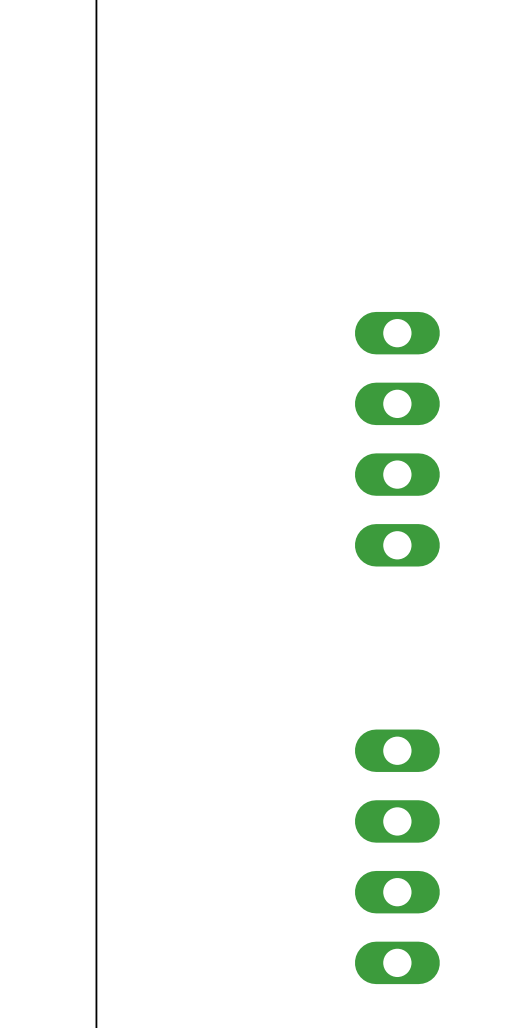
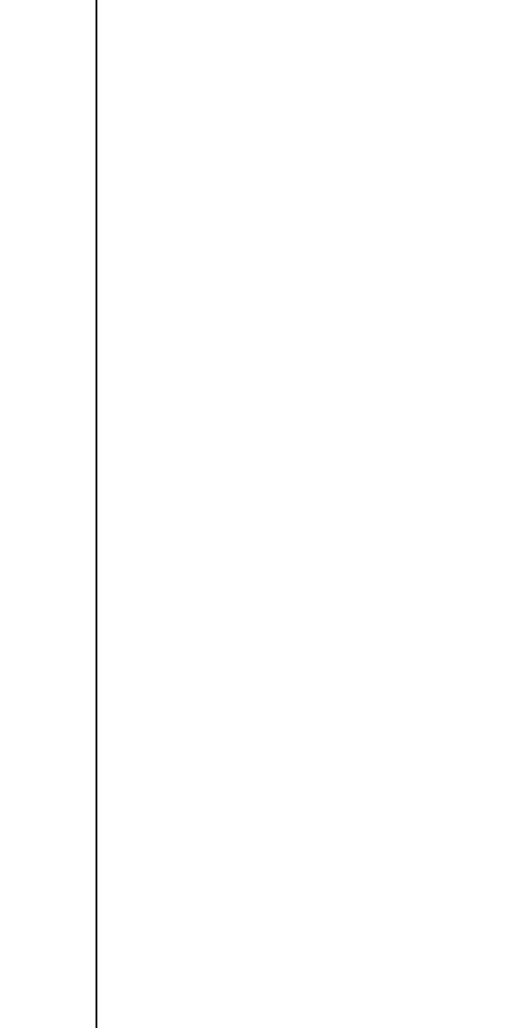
part: (397, 439) -> none
part: (397, 856) -> none

